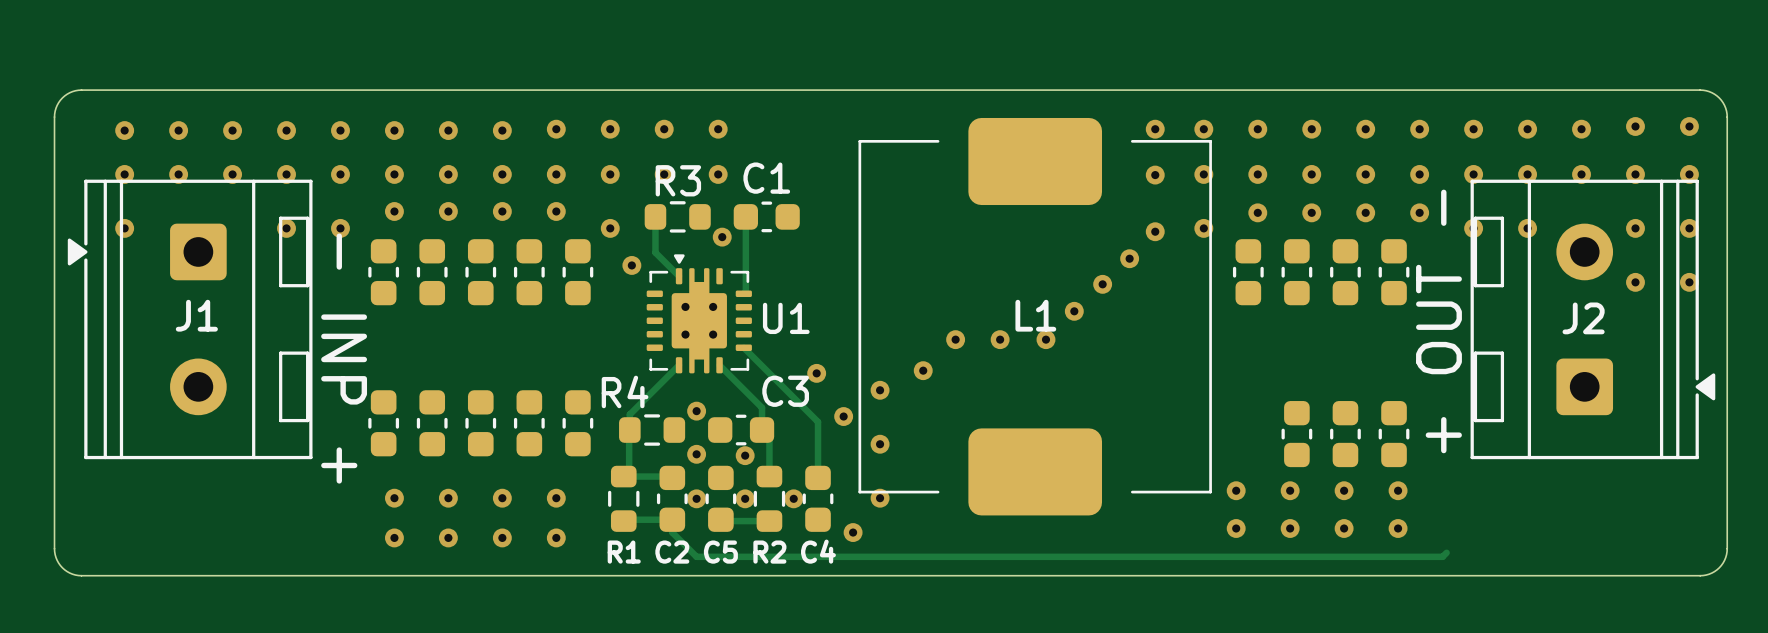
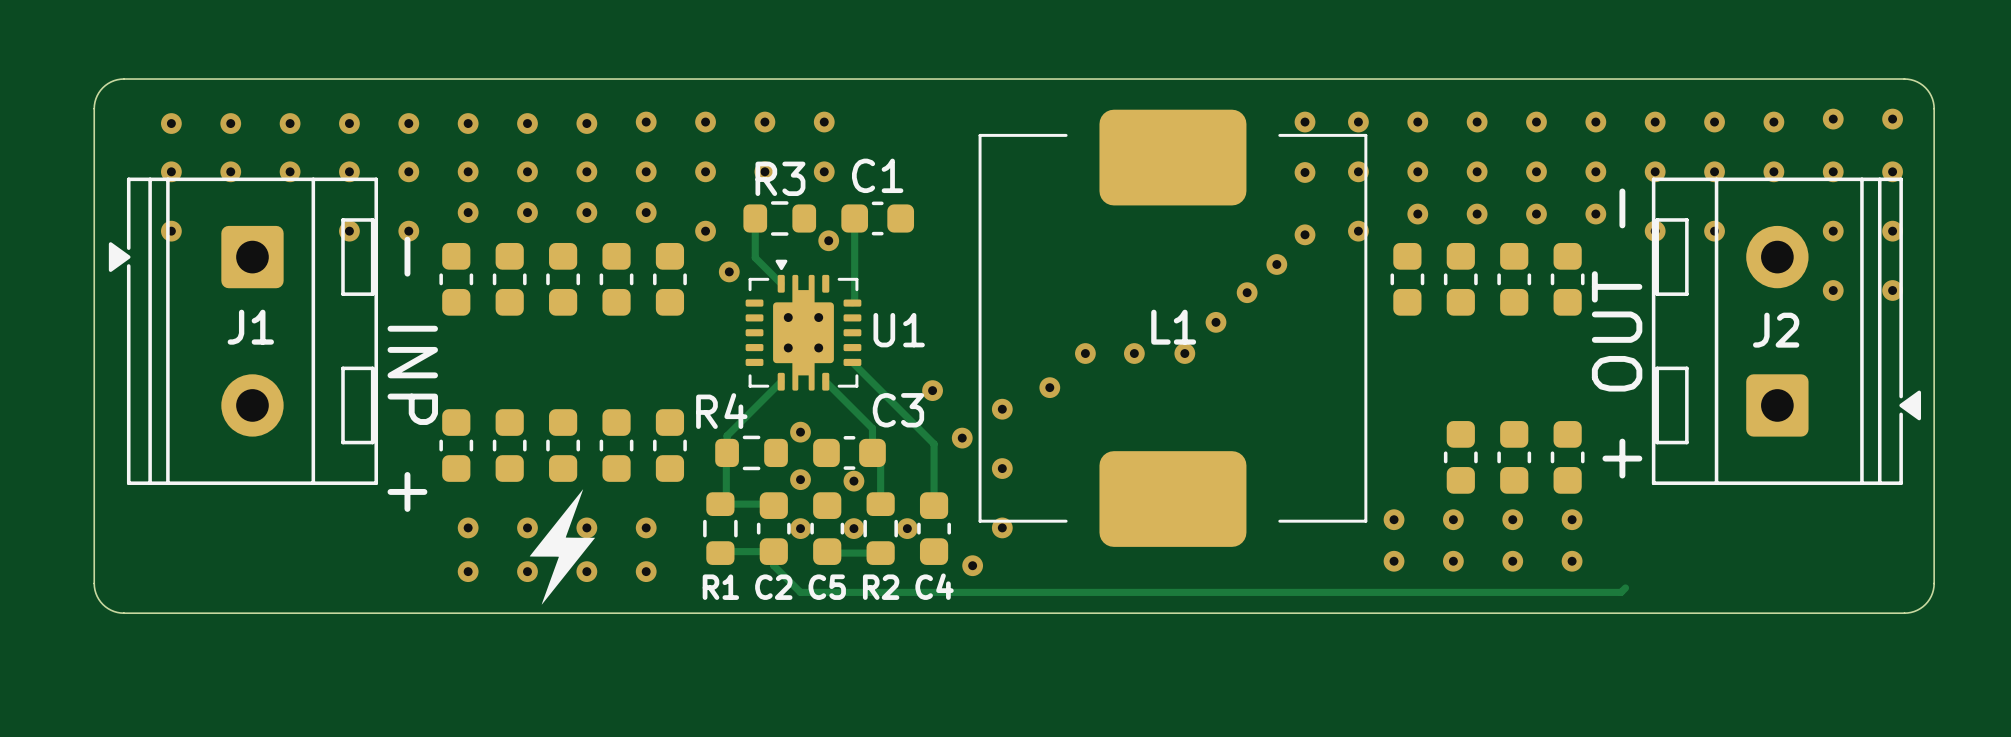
drawing: none -> [529, 489, 596, 605]

